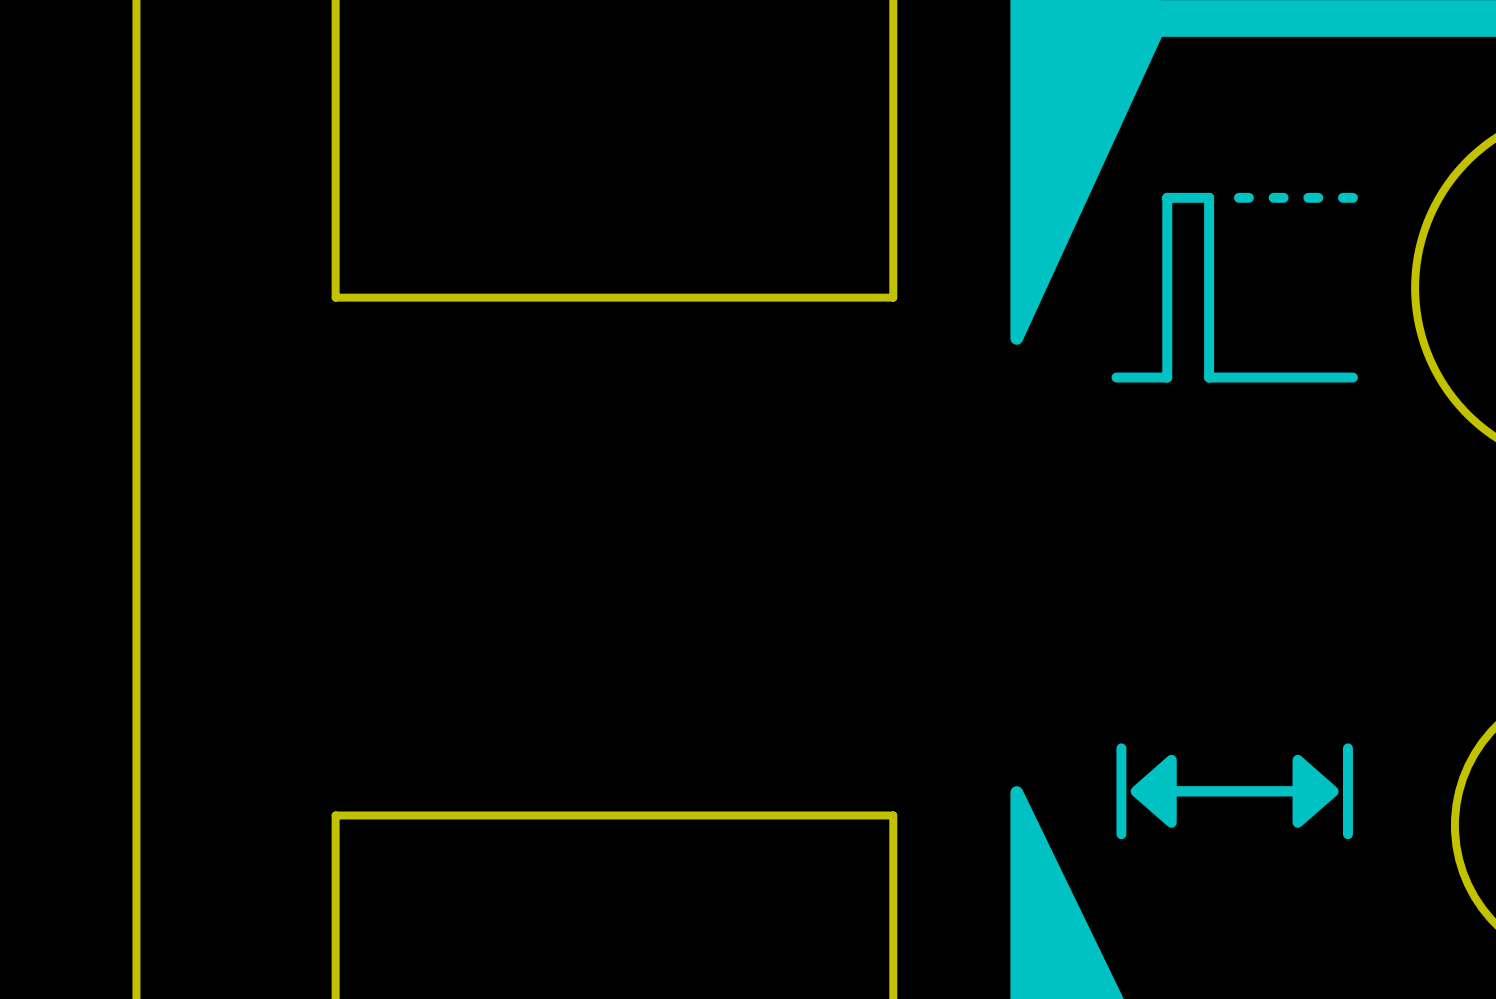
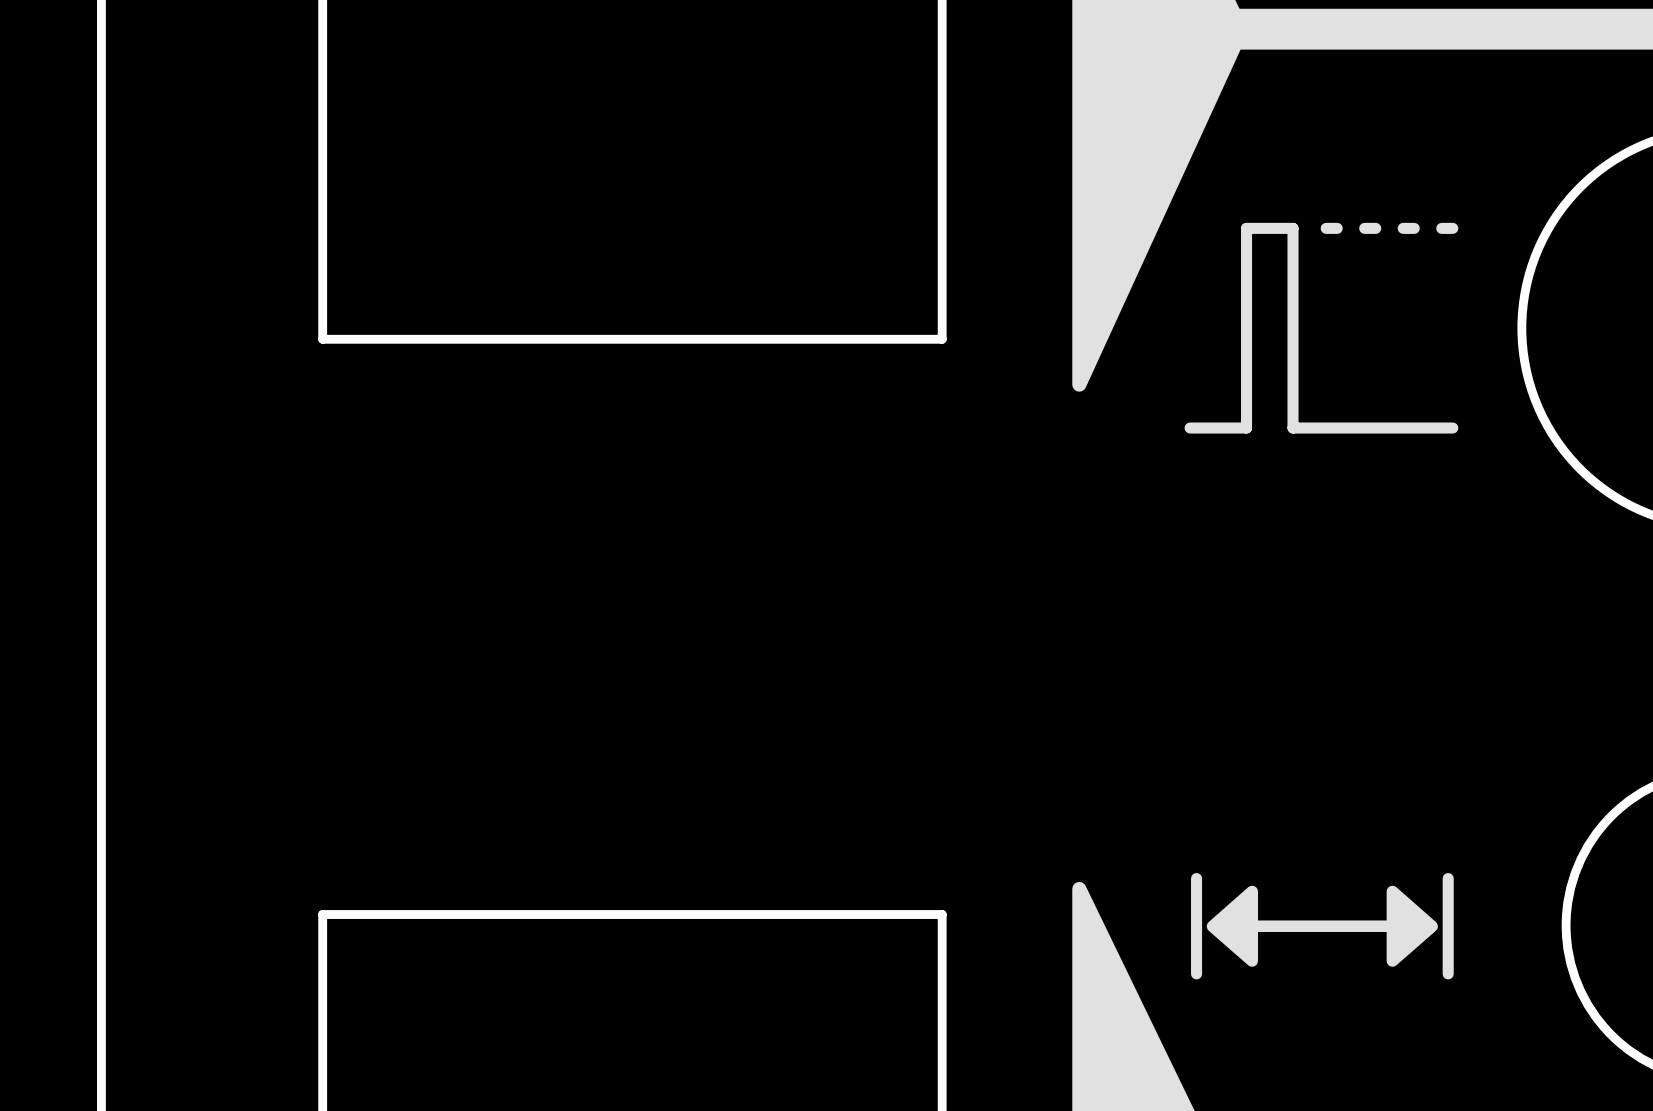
line: (1121, 748) (1121, 834) -> (1196, 878) (1196, 973)
line: (1347, 748) (1347, 834) -> (1448, 878) (1448, 973)
line: (1146, 791) (1322, 791) -> (1224, 926) (1420, 926)
drawing position: (1153, 791) -> (1232, 926)
drawing position: (1315, 791) -> (1412, 926)

